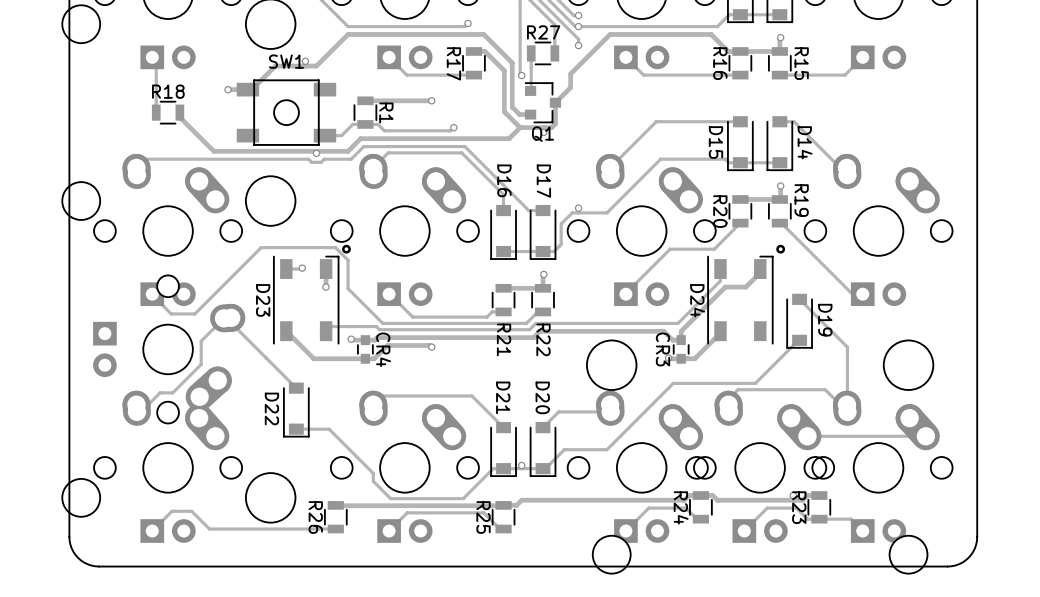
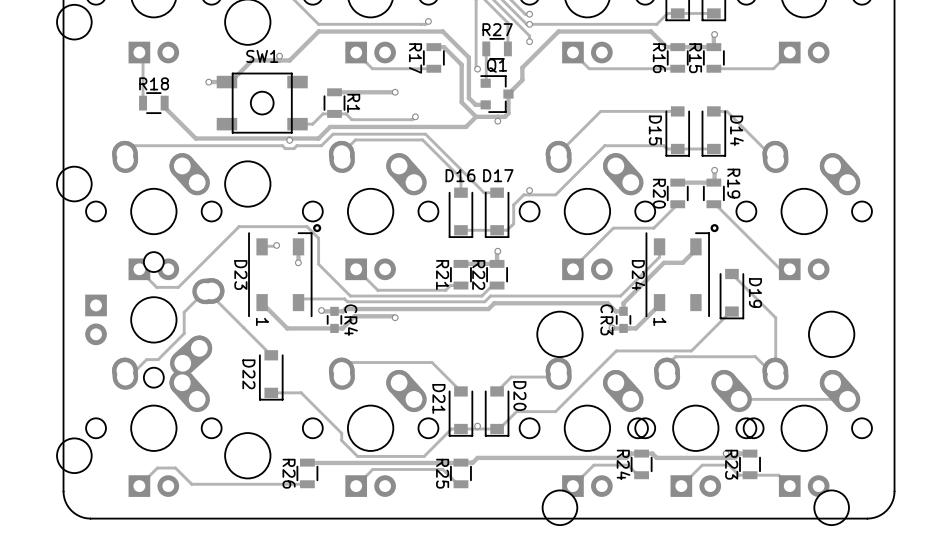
R15 name position: R15 (801, 63) -> R15 (695, 58)
Q1 name position: Q1 (543, 134) -> Q1 (497, 65)
D16 name rotation: 0° (504, 180) -> 90° counterclockwise (460, 175)
D17 name rotation: 0° (543, 181) -> 90° counterclockwise (498, 175)
D23 footprint: [273, 255, 340, 345] -> [248, 232, 313, 317]
D24 footprint: [707, 255, 774, 345] -> [645, 232, 710, 317]
R21 name position: R21 (504, 339) -> R21 (442, 274)
R22 name position: R22 (543, 339) -> R22 (478, 274)
D21 name position: D21 (503, 397) -> D21 (438, 398)
D20 name position: D20 (542, 397) -> D20 (519, 396)

